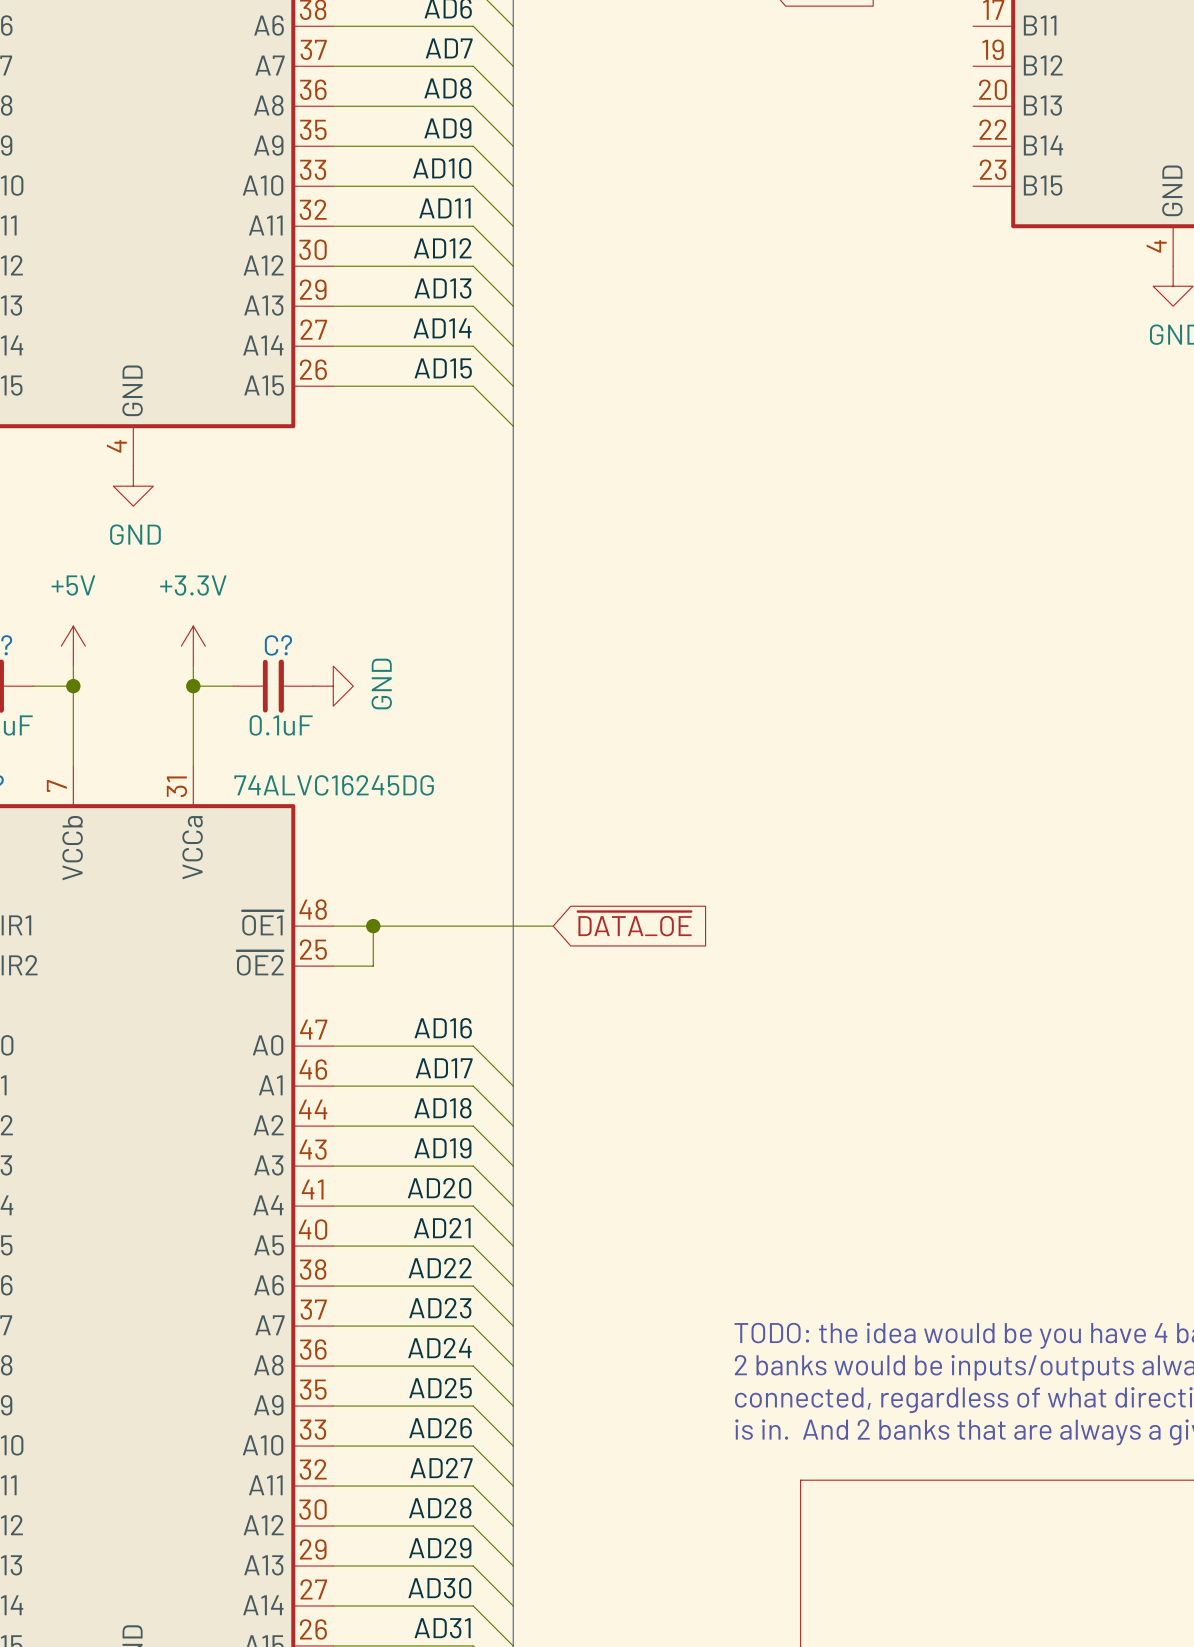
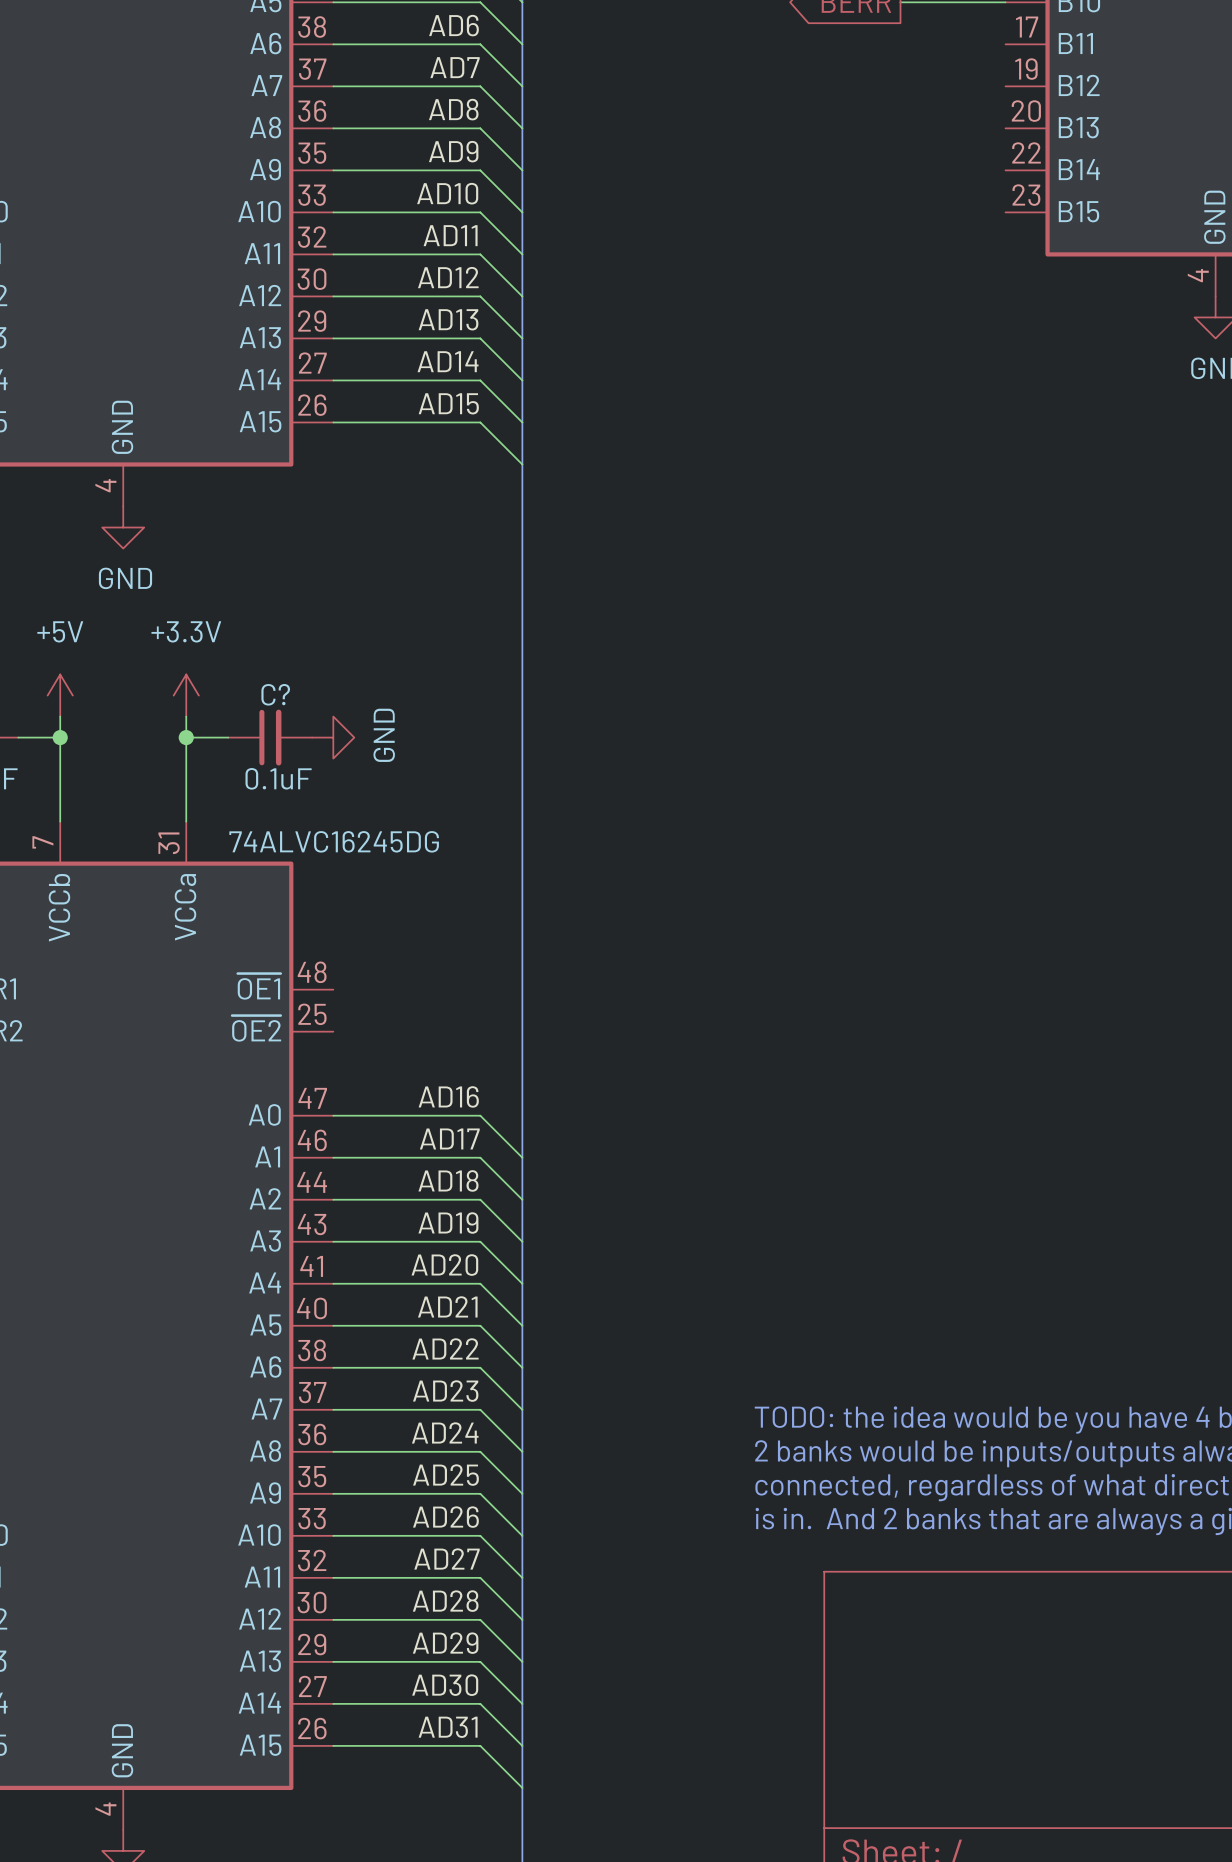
global label: ~{DATA_OE} (634, 923) -> none
wire: (333, 926) (553, 926) -> none
wire: (373, 926) (373, 966) (333, 966) -> none
junction: (373, 926) -> none

